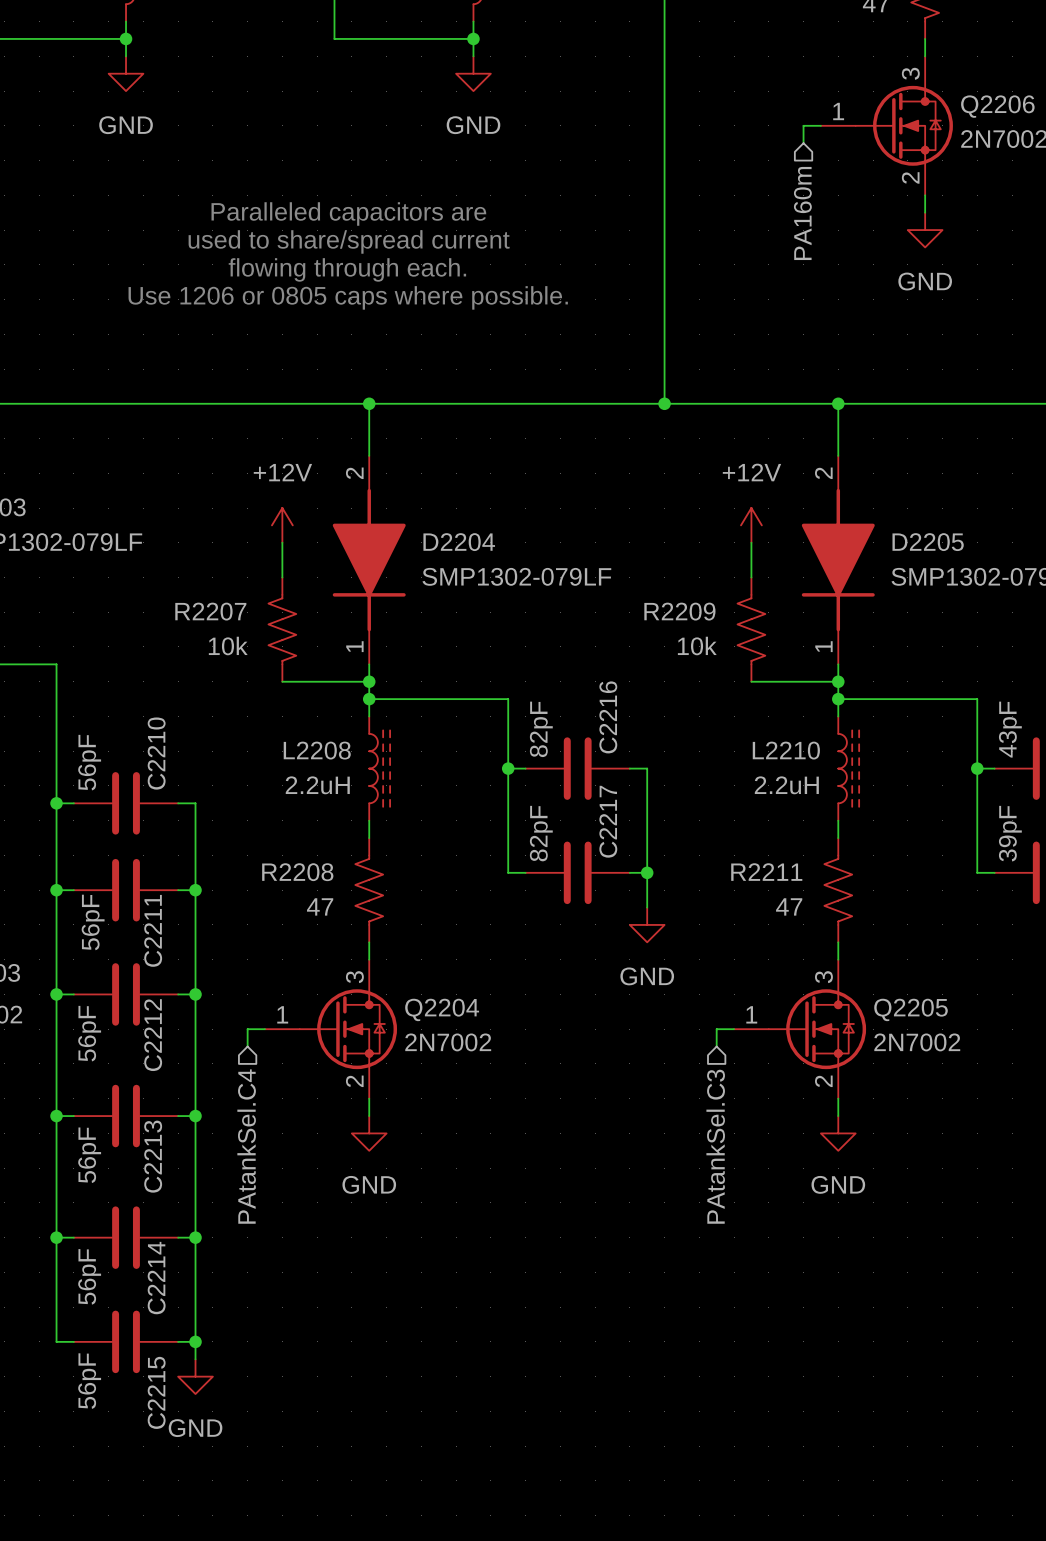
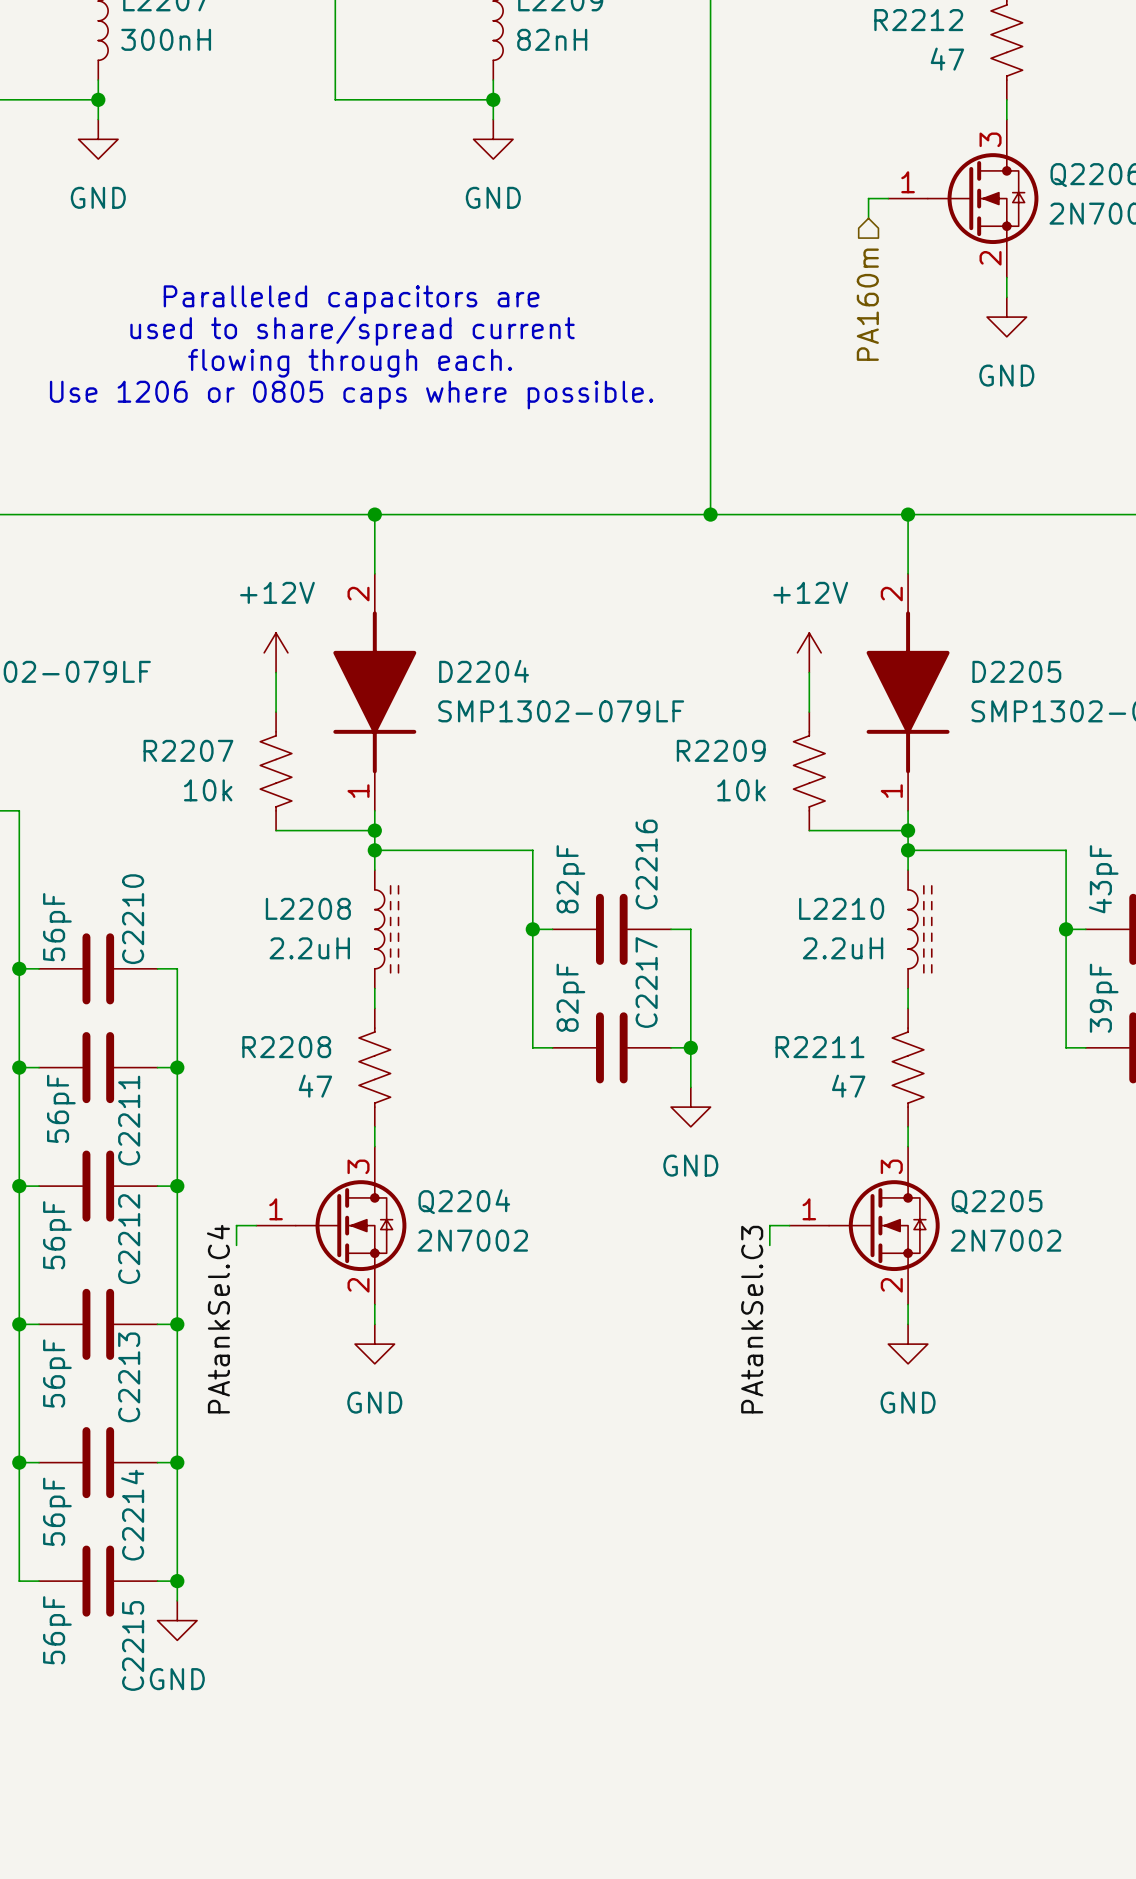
label: none -> PAtankSel.C4 (218, 1319)
label: none -> PAtankSel.C3 (752, 1319)
hierarchical label: PAtankSel.C4 (246, 1146) -> none
hierarchical label: PAtankSel.C3 (715, 1146) -> none

